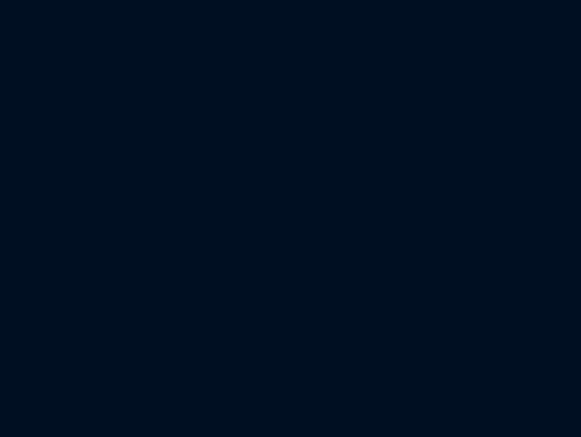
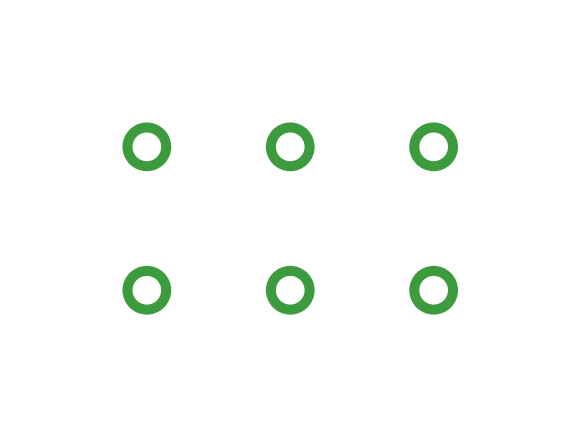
part: none -> (290, 218)

